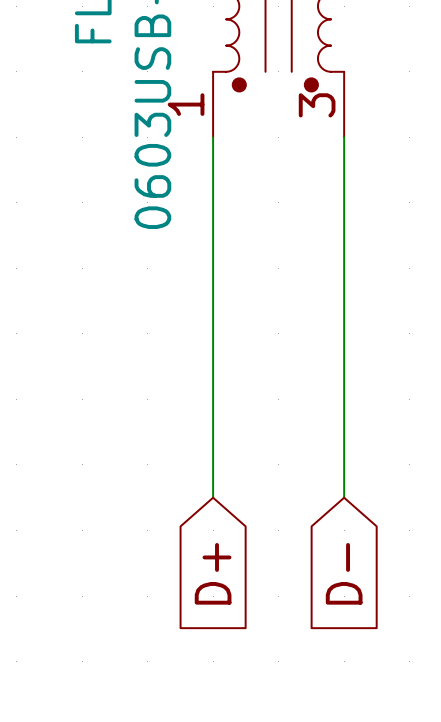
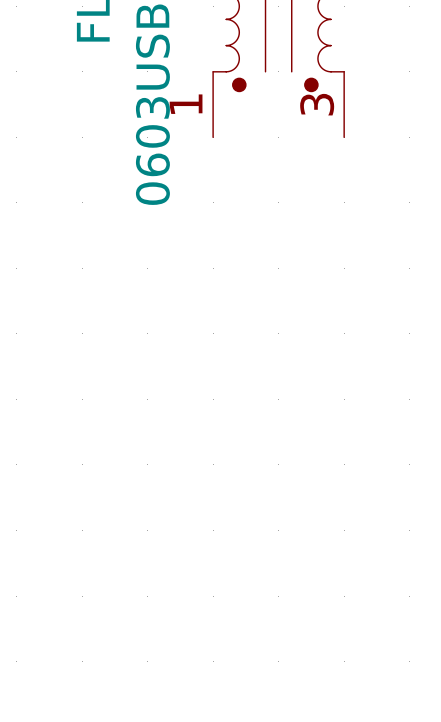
wire: (213, 137) (213, 497) -> none
wire: (344, 137) (344, 497) -> none
global label: D+ (213, 573) -> none
global label: D- (344, 573) -> none

